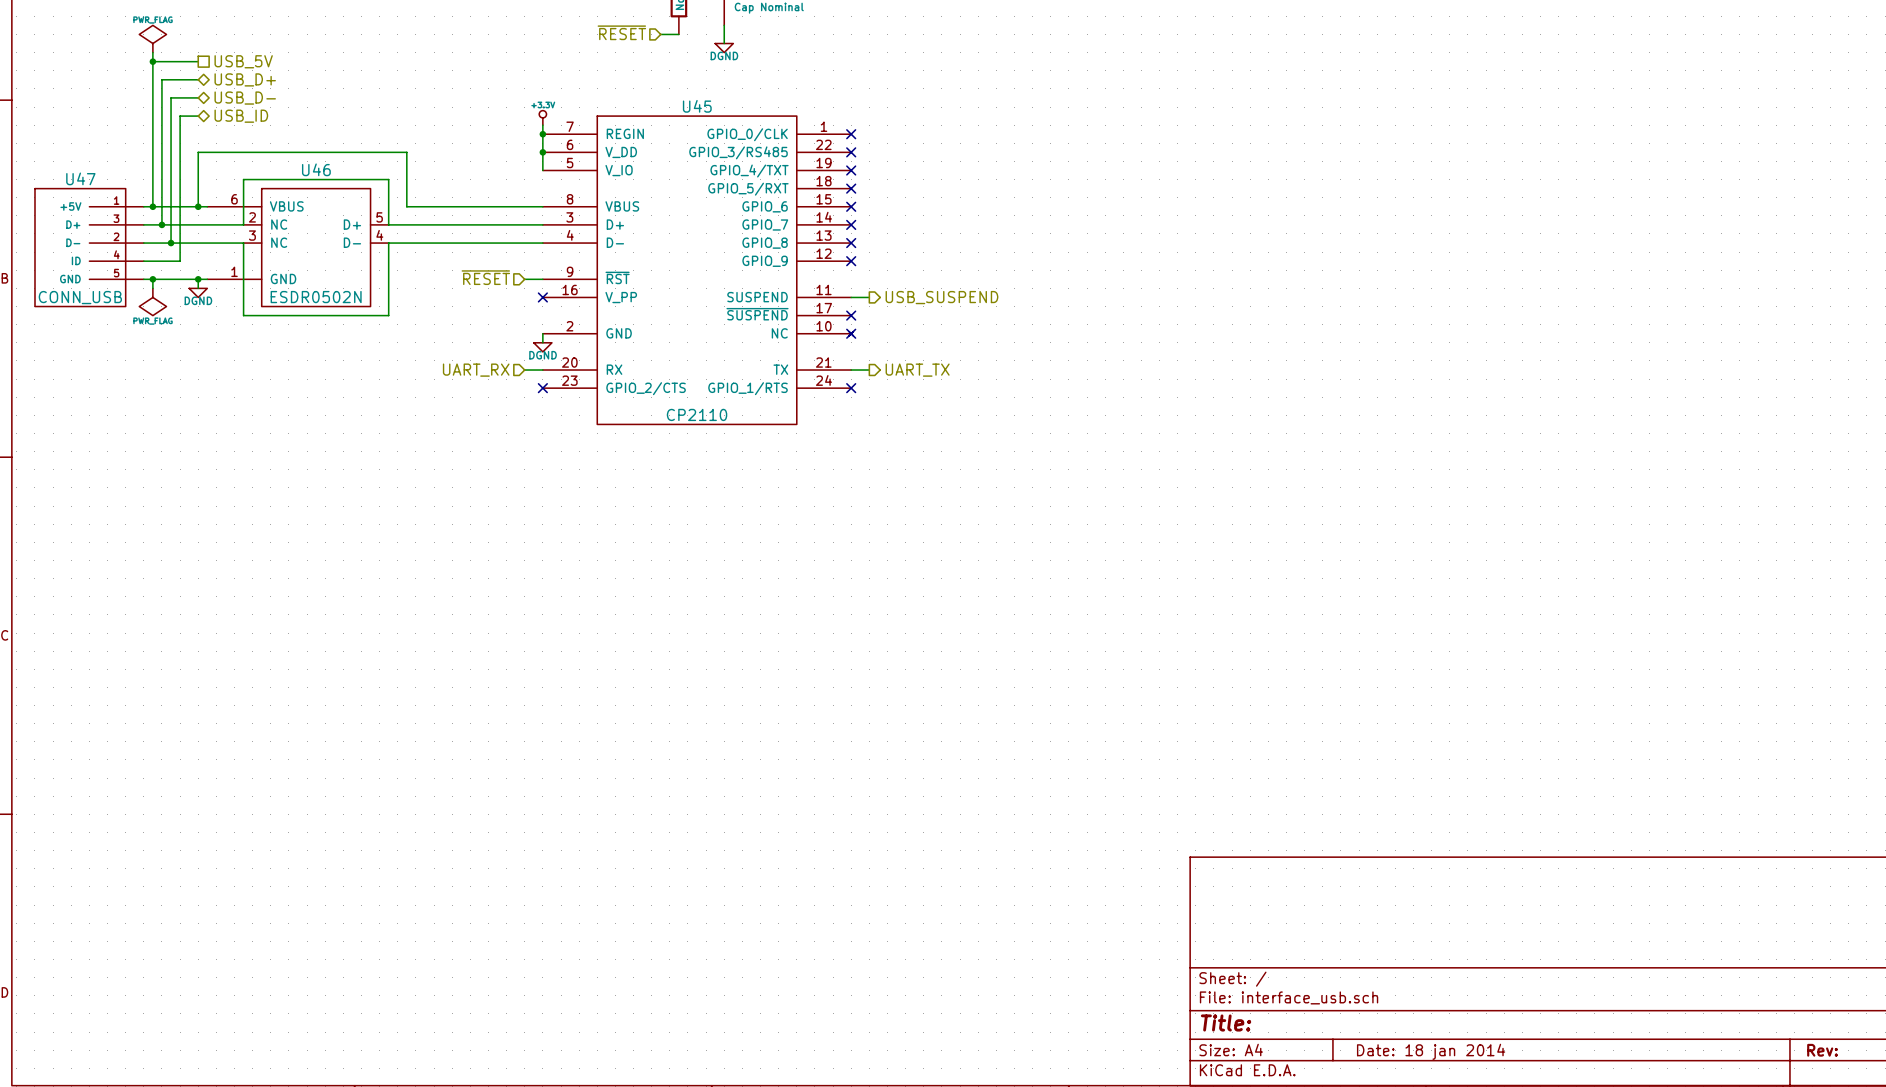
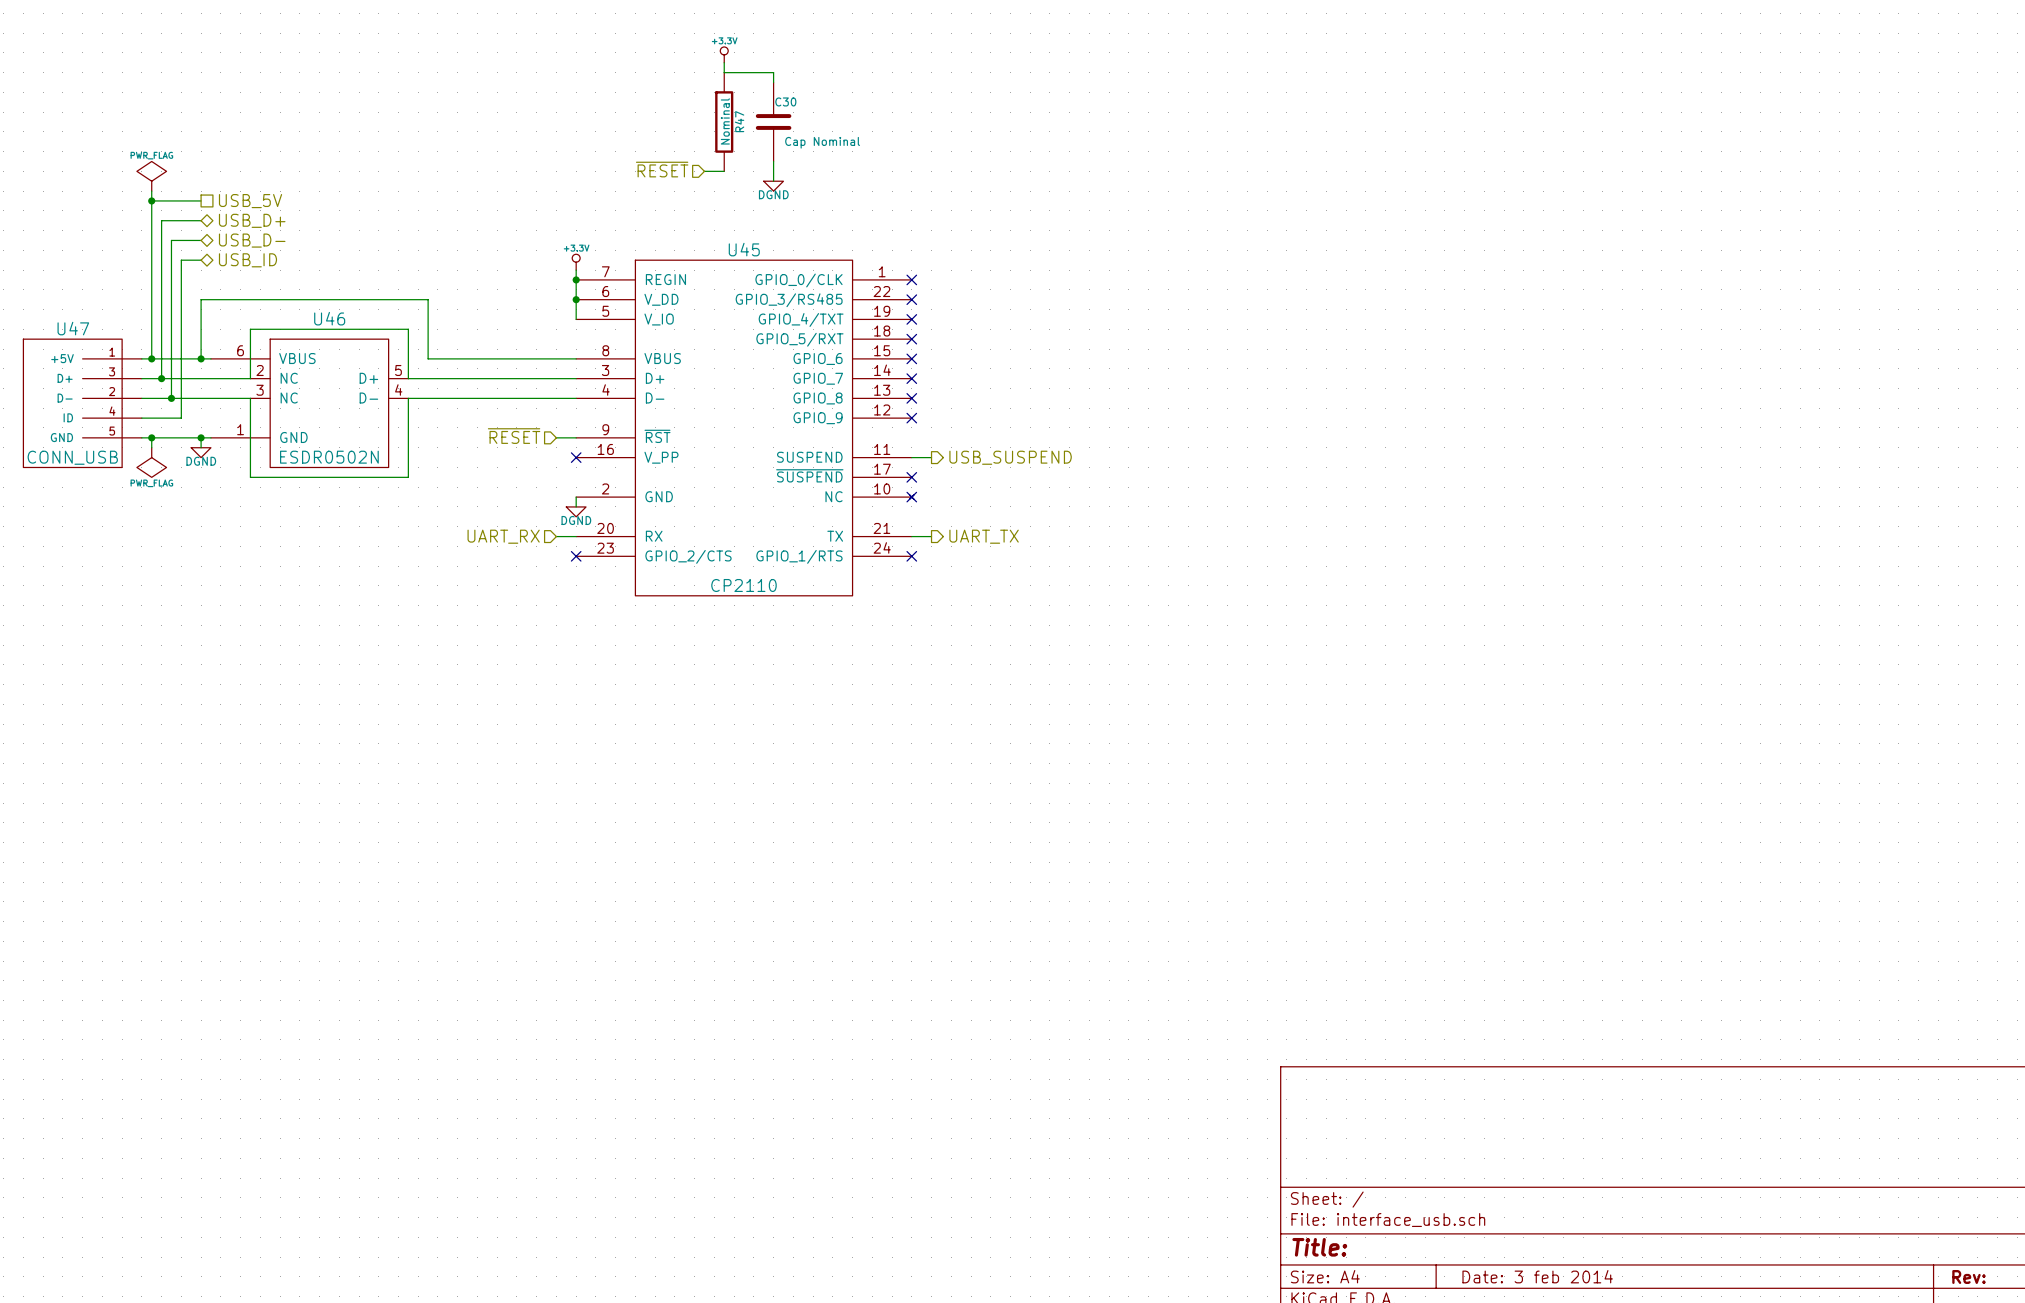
title block: Date: 18 jan 2014 (1431, 1051) -> Date: 3 feb 2014 (1537, 1276)

